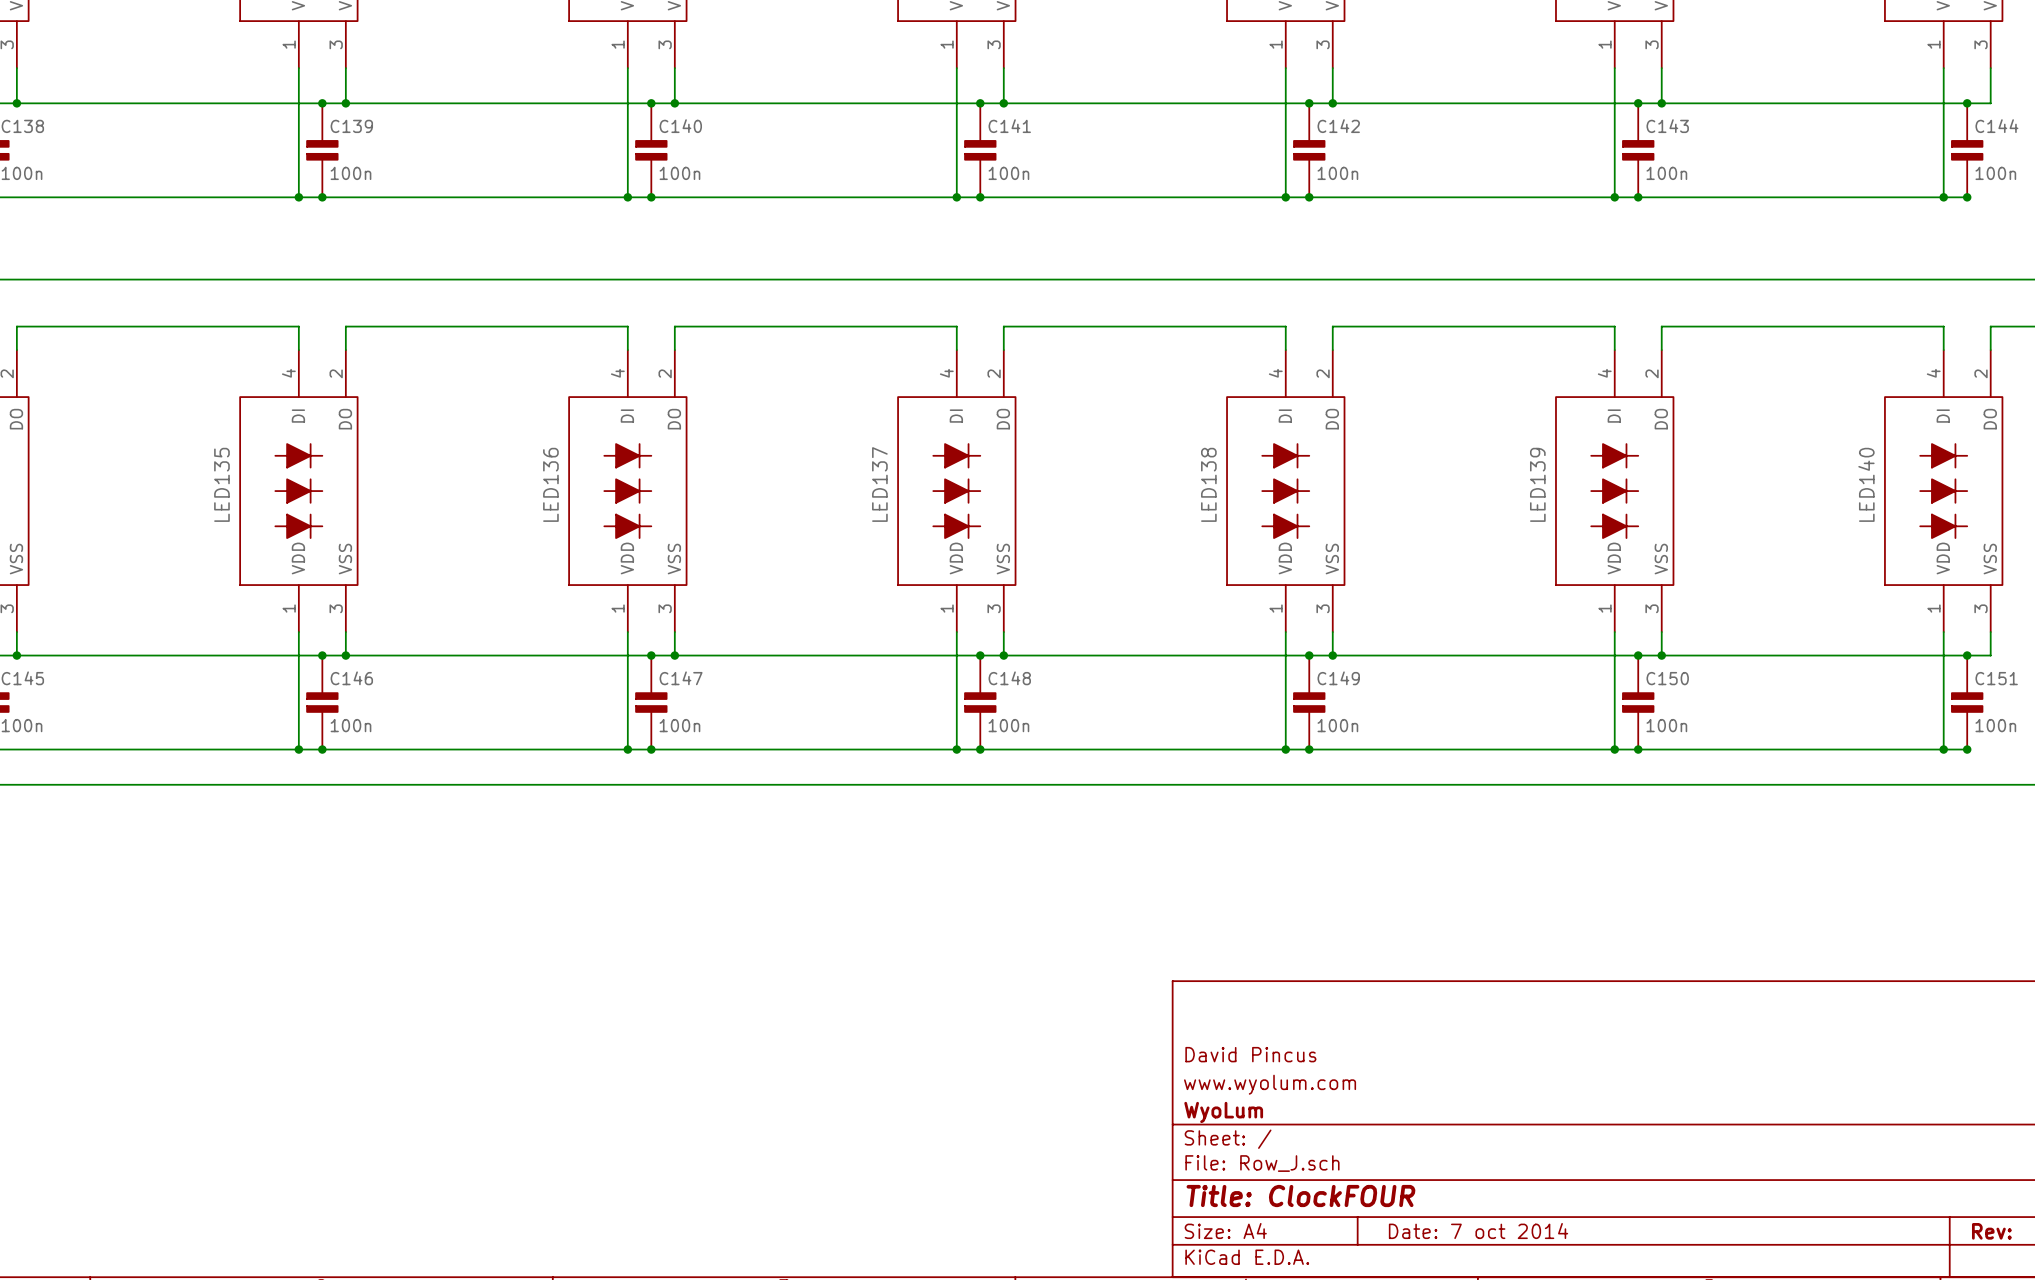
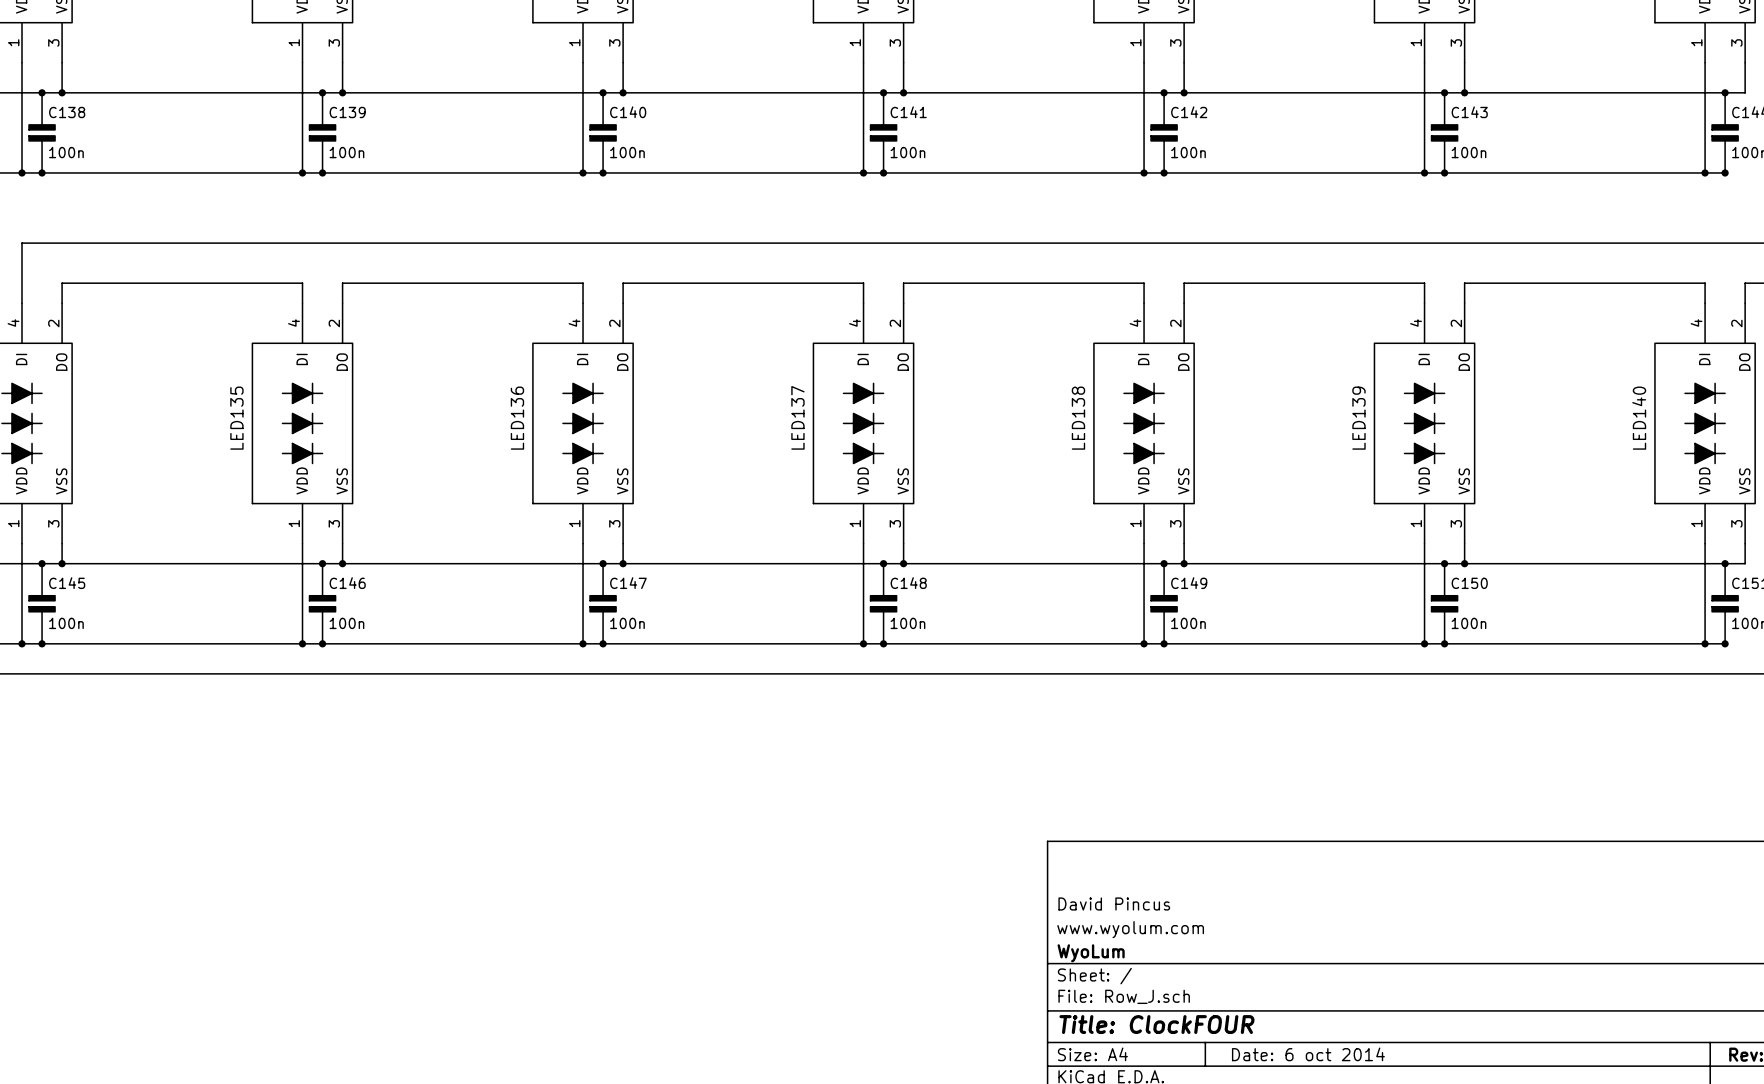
title block: Date: 7 oct 2014 (1478, 1231) -> Date: 6 oct 2014 (1308, 1054)

